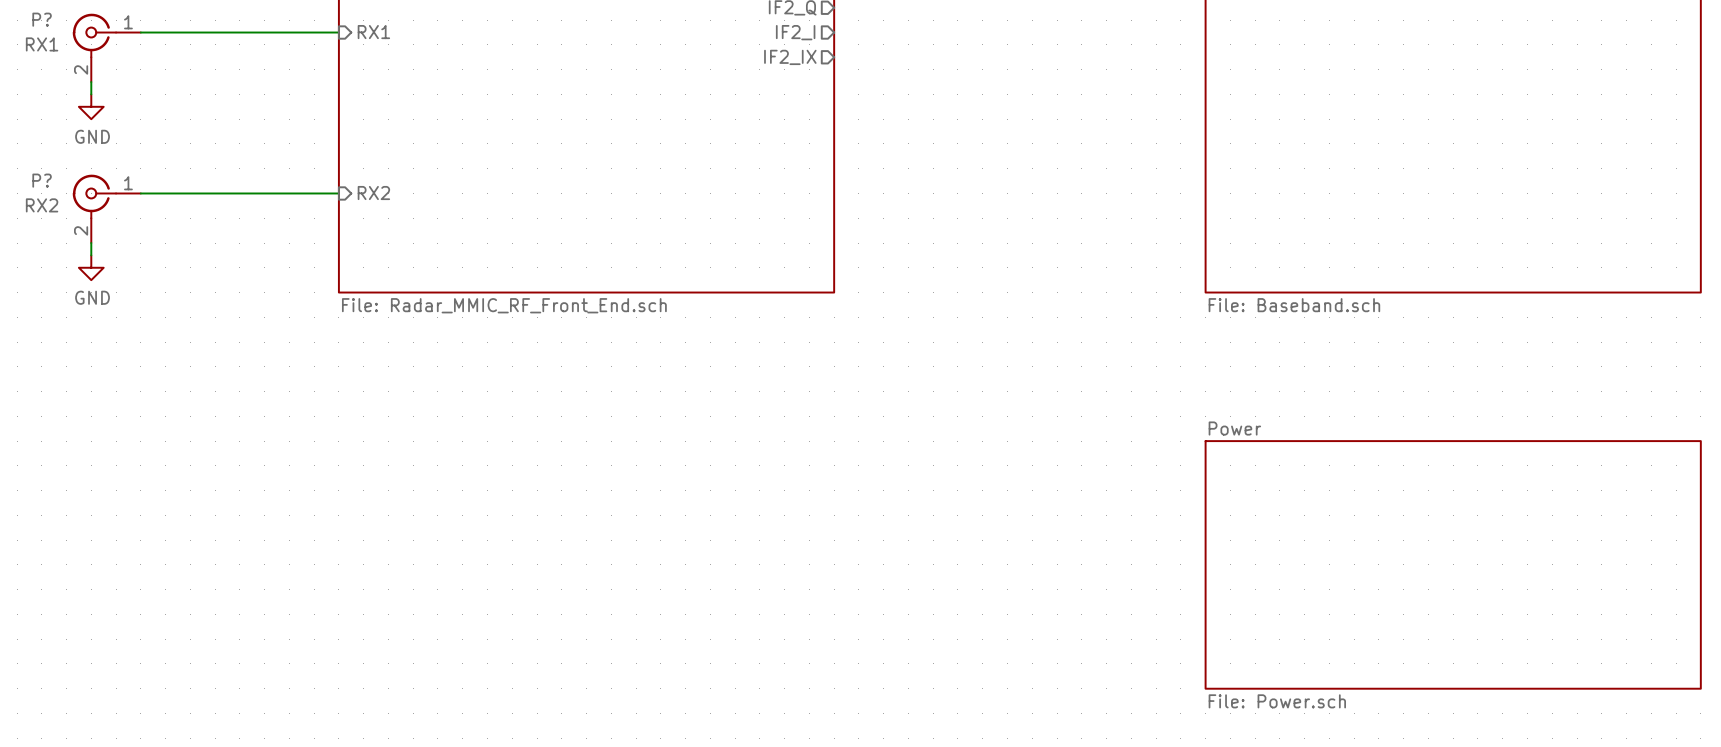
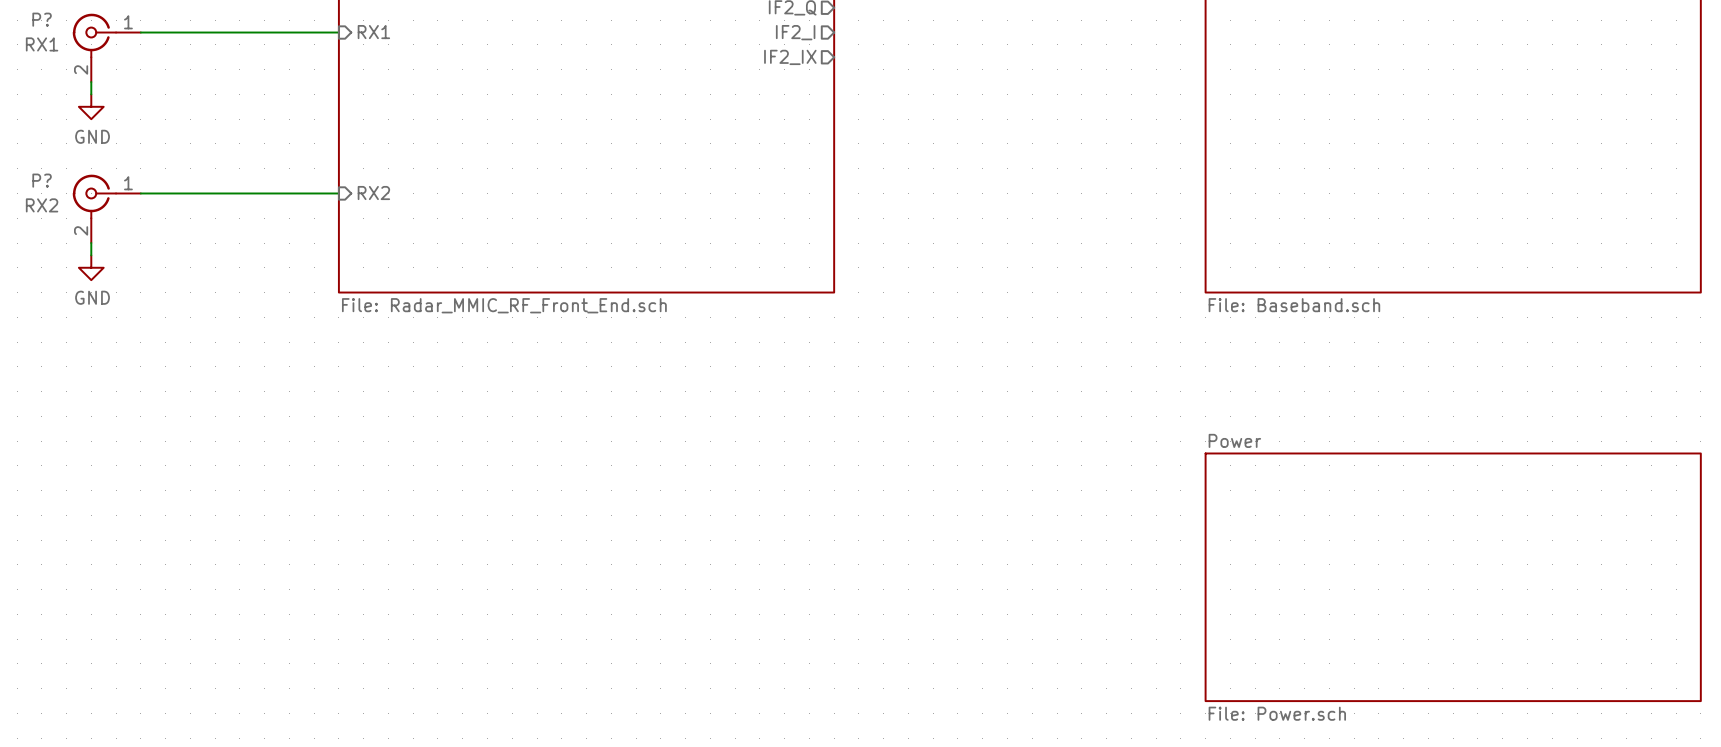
sheet Power position: (1453, 564) -> (1453, 577)

